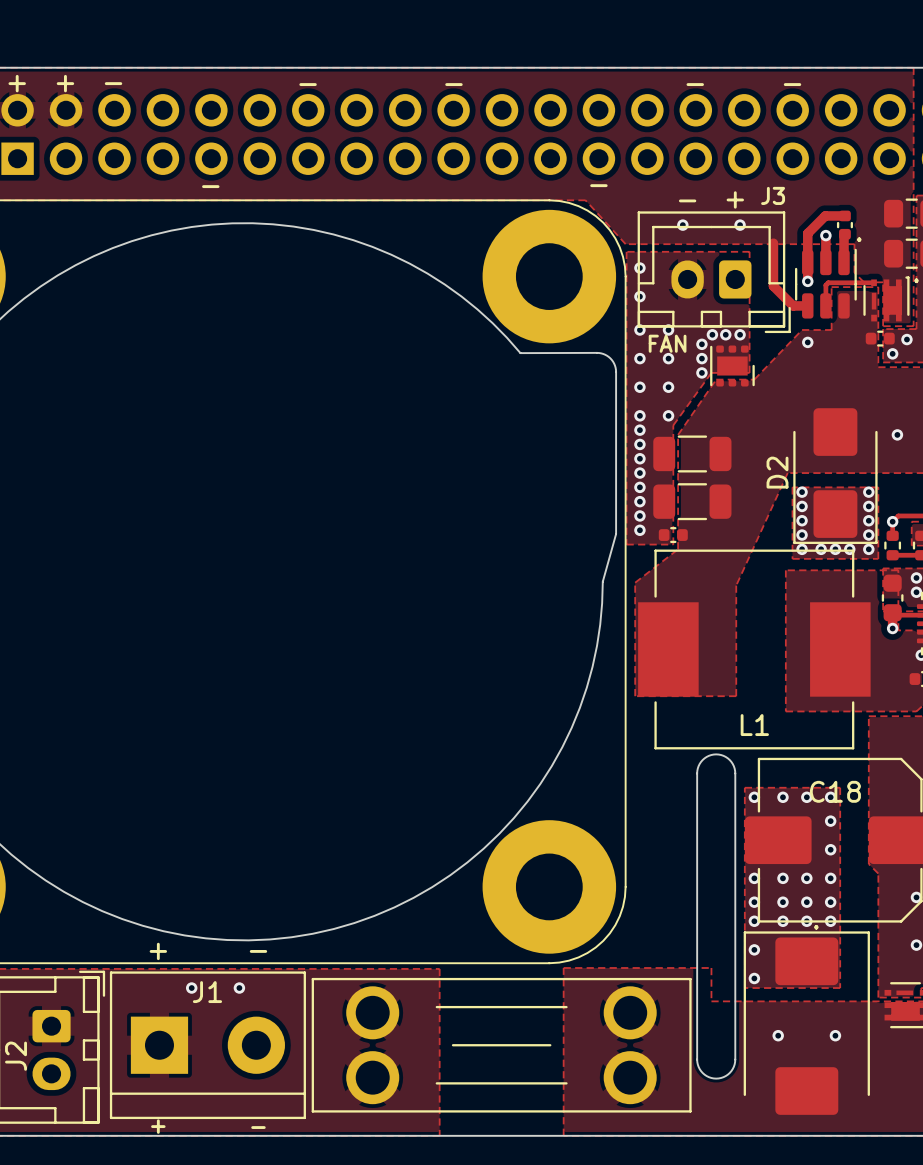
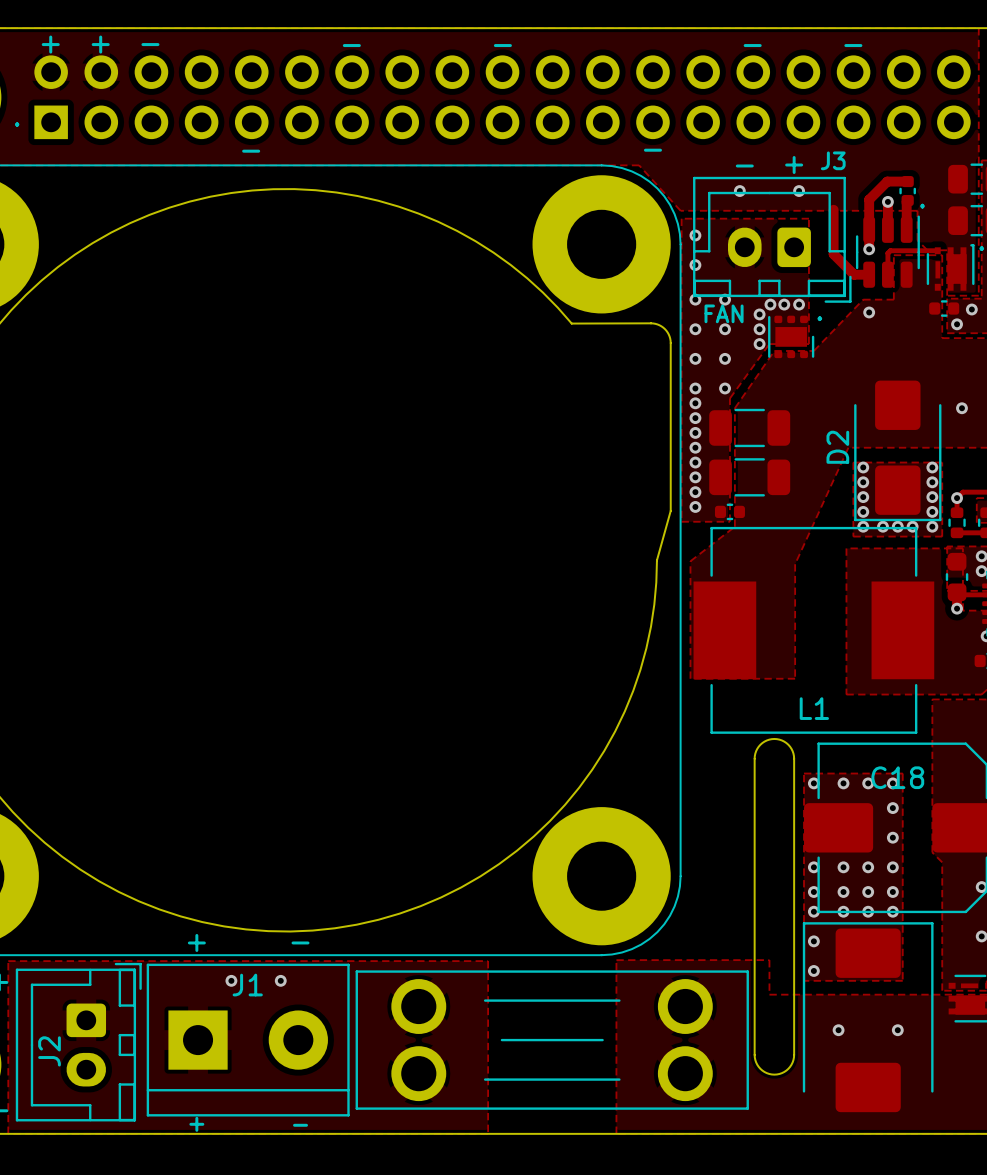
text: none -> . (819, 318)
text: . (816, 927) -> none

